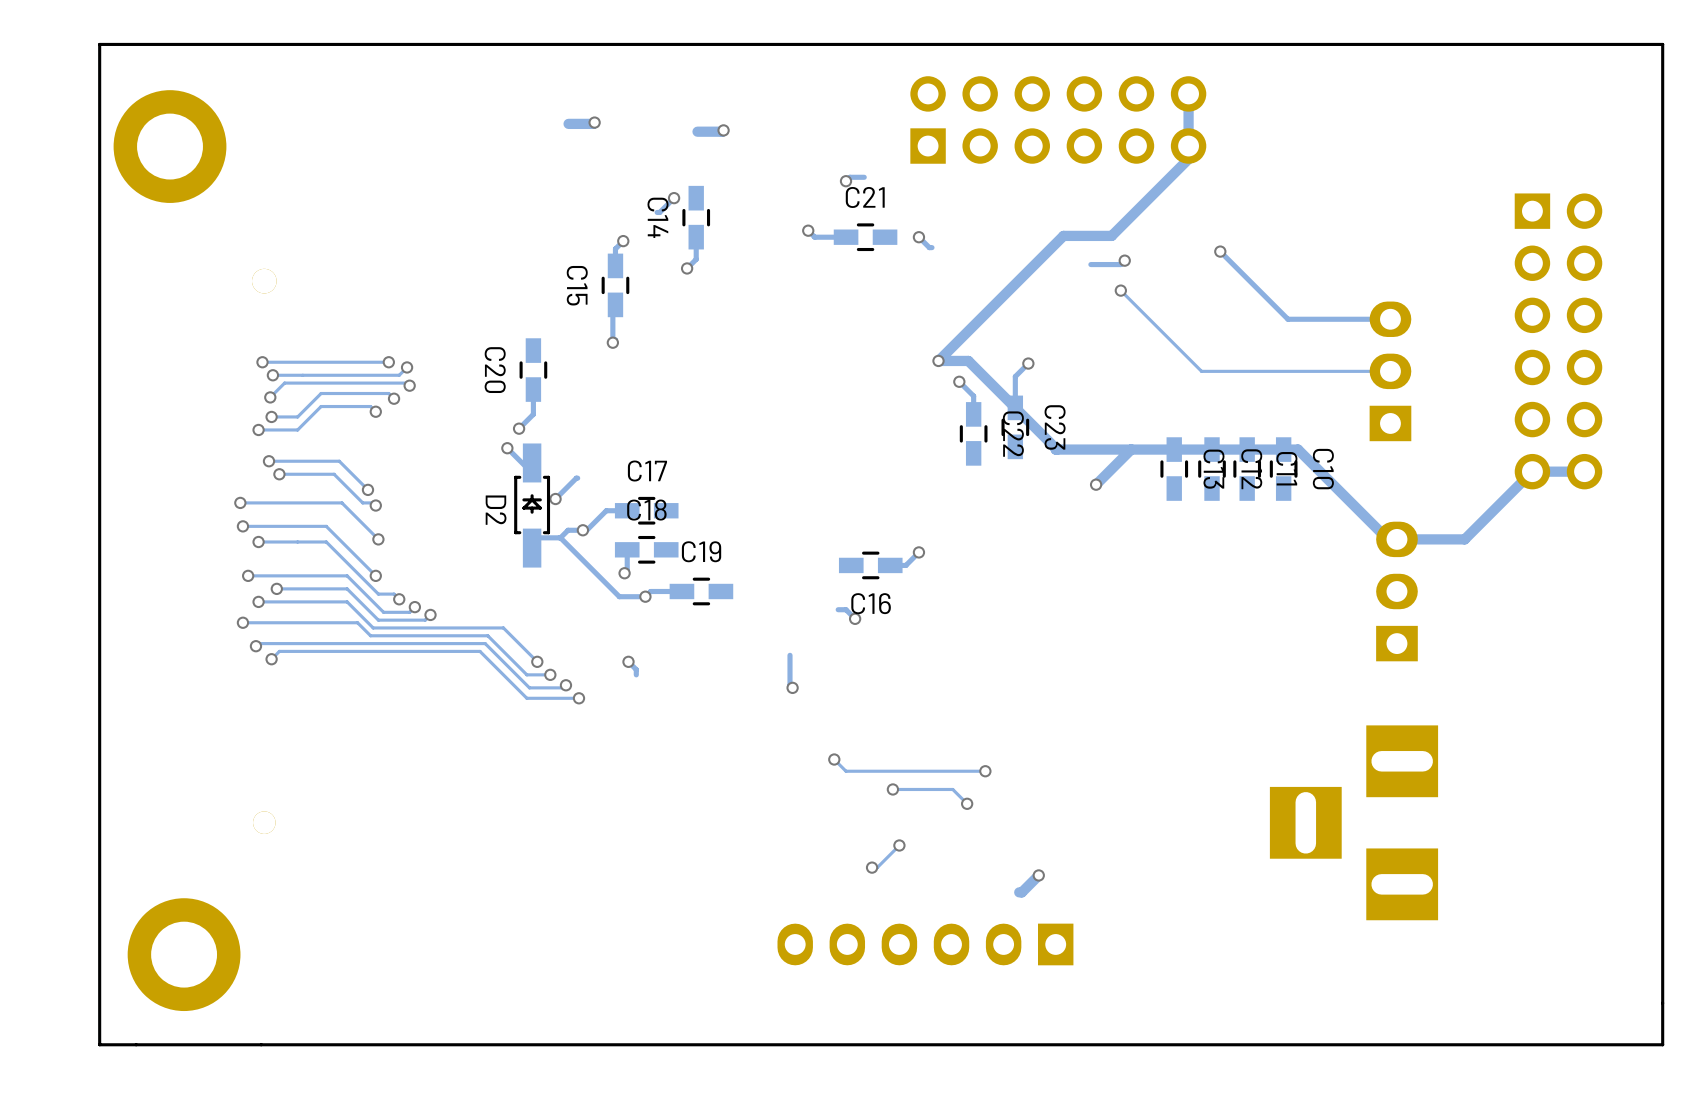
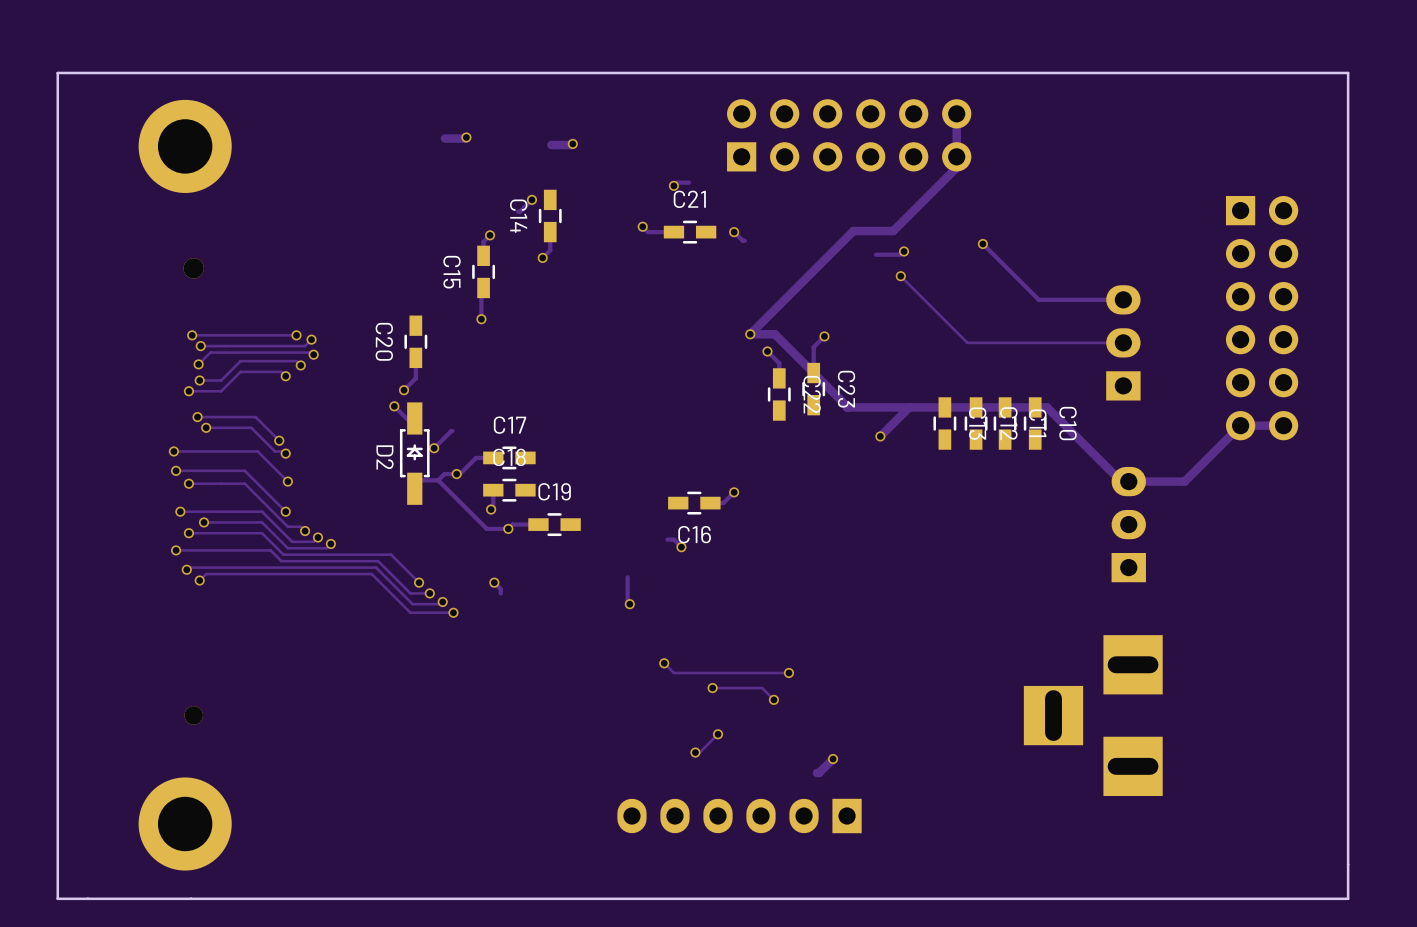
part position: (170, 146) -> (185, 146)
part position: (184, 954) -> (185, 824)

